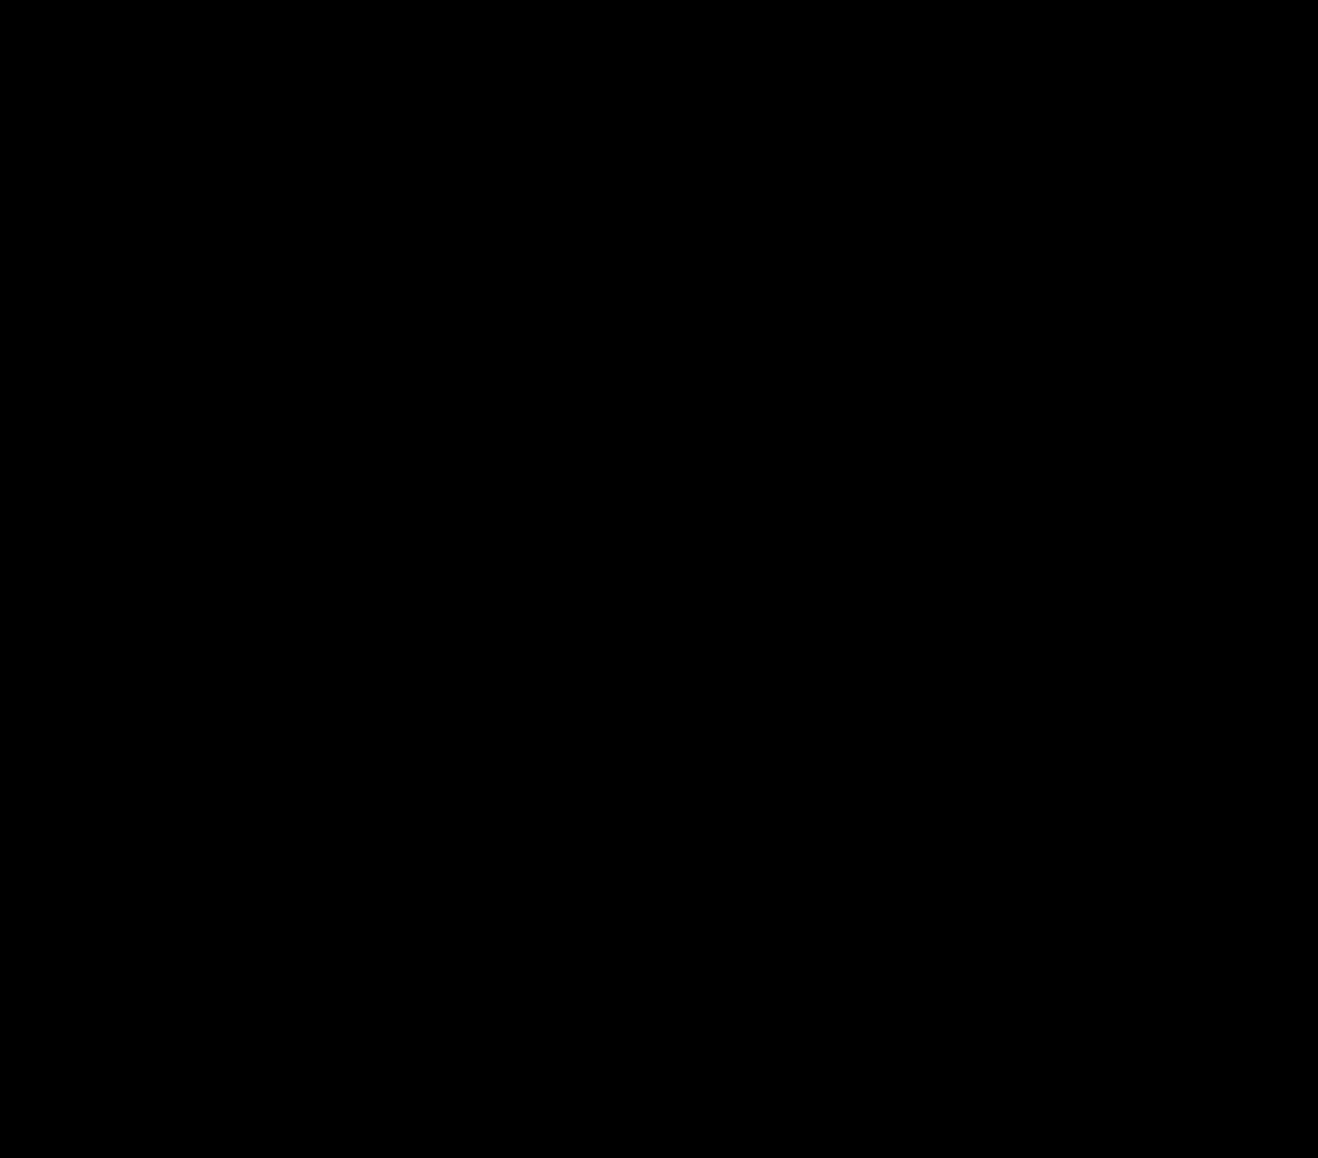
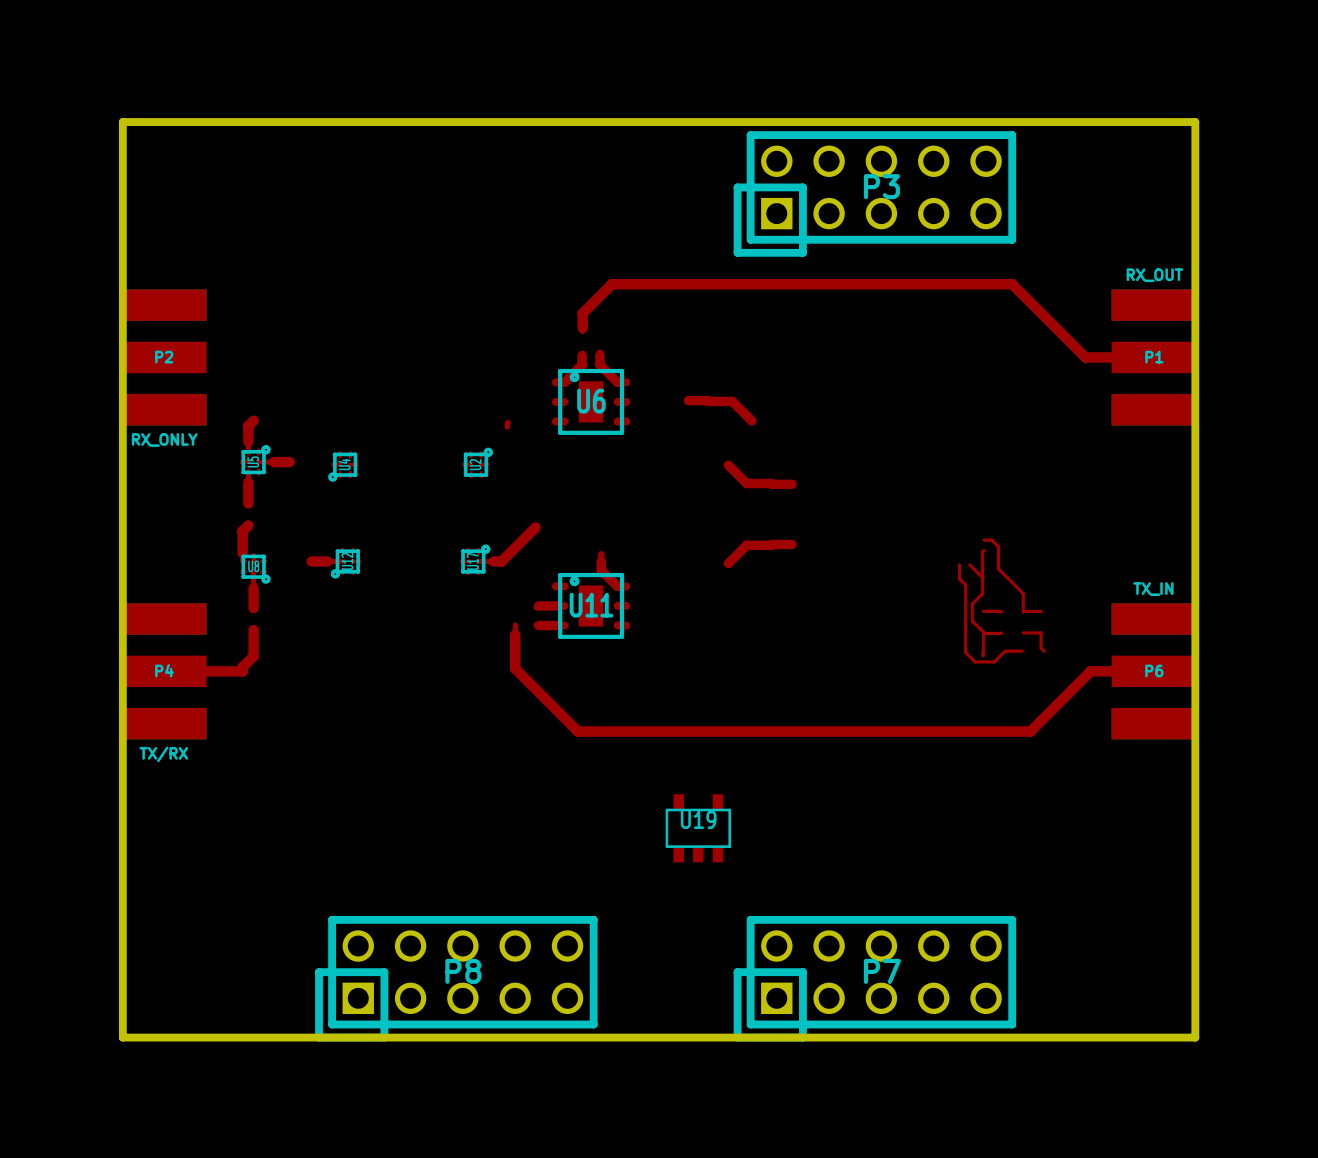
board edge: none -> (122, 122) (122, 1037) (1195, 1037) (1195, 122) (122, 122)
P3: none -> (874, 193)
top track: none -> (582, 331) (582, 313) (611, 284) (1012, 284) (1085, 357) (1153, 357)
top track: none -> (599, 352) (599, 364) (617, 382) (621, 382)
top track: none -> (582, 355) (582, 364) (564, 382) (560, 382)
P2: none -> RX_ONLY (164, 357)
P1: none -> RX_OUT (1153, 357)
top track: none -> (688, 400) (732, 401) (751, 421)
U6: none -> (591, 401)
top track: none -> (253, 420) (248, 425) (248, 452)
top track: none -> (508, 422) (507, 427)
U5: none -> (255, 460)
top track: none -> (261, 462) (289, 462)
U2: none -> (477, 462)
top track: none -> (728, 465) (746, 483) (791, 484)
U4: none -> (343, 466)
top track: none -> (248, 472) (248, 503)
top track: none -> (248, 525) (242, 531) (243, 561)
top track: none -> (535, 527) (501, 561) (481, 561)
top track: none -> (984, 540) (991, 540) (998, 546) (998, 568) (1023, 593) (1023, 611) (1041, 611)
top track: none -> (791, 544) (746, 545) (728, 563)
top track: none -> (984, 550) (982, 552) (982, 593) (972, 603) (972, 621) (983, 632) (983, 655) (983, 651)
top track: none -> (601, 554) (601, 570) (617, 586) (621, 586)
U17: none -> (475, 559)
top track: none -> (311, 561) (339, 561)
U12: none -> (346, 563)
top track: none -> (959, 564) (959, 578) (965, 585) (965, 652) (975, 661) (994, 661) (1004, 651) (1022, 651)
top track: none -> (969, 564) (982, 577)
U8: none -> (255, 568)
top track: none -> (253, 574) (253, 608)
top track: none -> (560, 605) (538, 605) (535, 607)
U11: none -> (591, 605)
top track: none -> (983, 611) (1001, 611)
top track: none -> (515, 625) (515, 634)
top track: none -> (535, 625) (560, 625)
top track: none -> (253, 630) (253, 656) (242, 667) (242, 671) (164, 671)
top track: none -> (1001, 632) (983, 633)
top track: none -> (1023, 632) (1040, 632) (1041, 648) (1044, 651)
top track: none -> (515, 634) (515, 668) (577, 731) (1030, 731) (1090, 671) (1153, 671)
P4: none -> TX/RX (164, 671)
P6: none -> TX_IN (1153, 671)
U19: none -> (698, 828)
P8: none -> (456, 978)
P7: none -> (874, 978)

